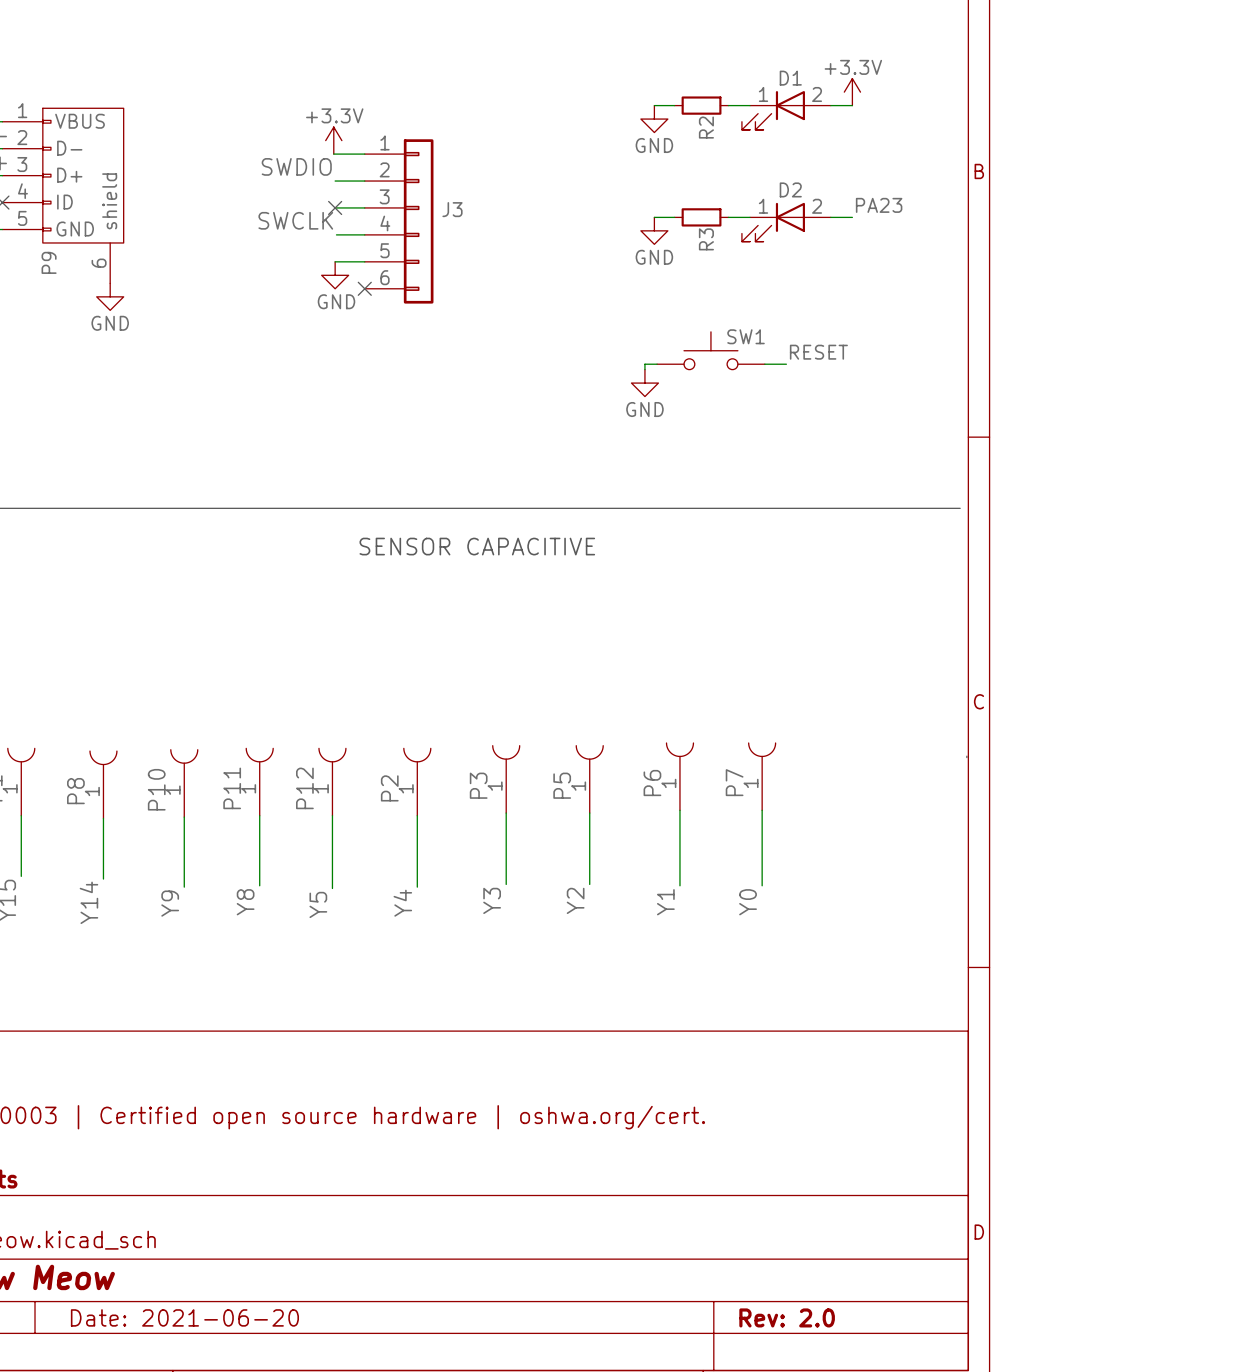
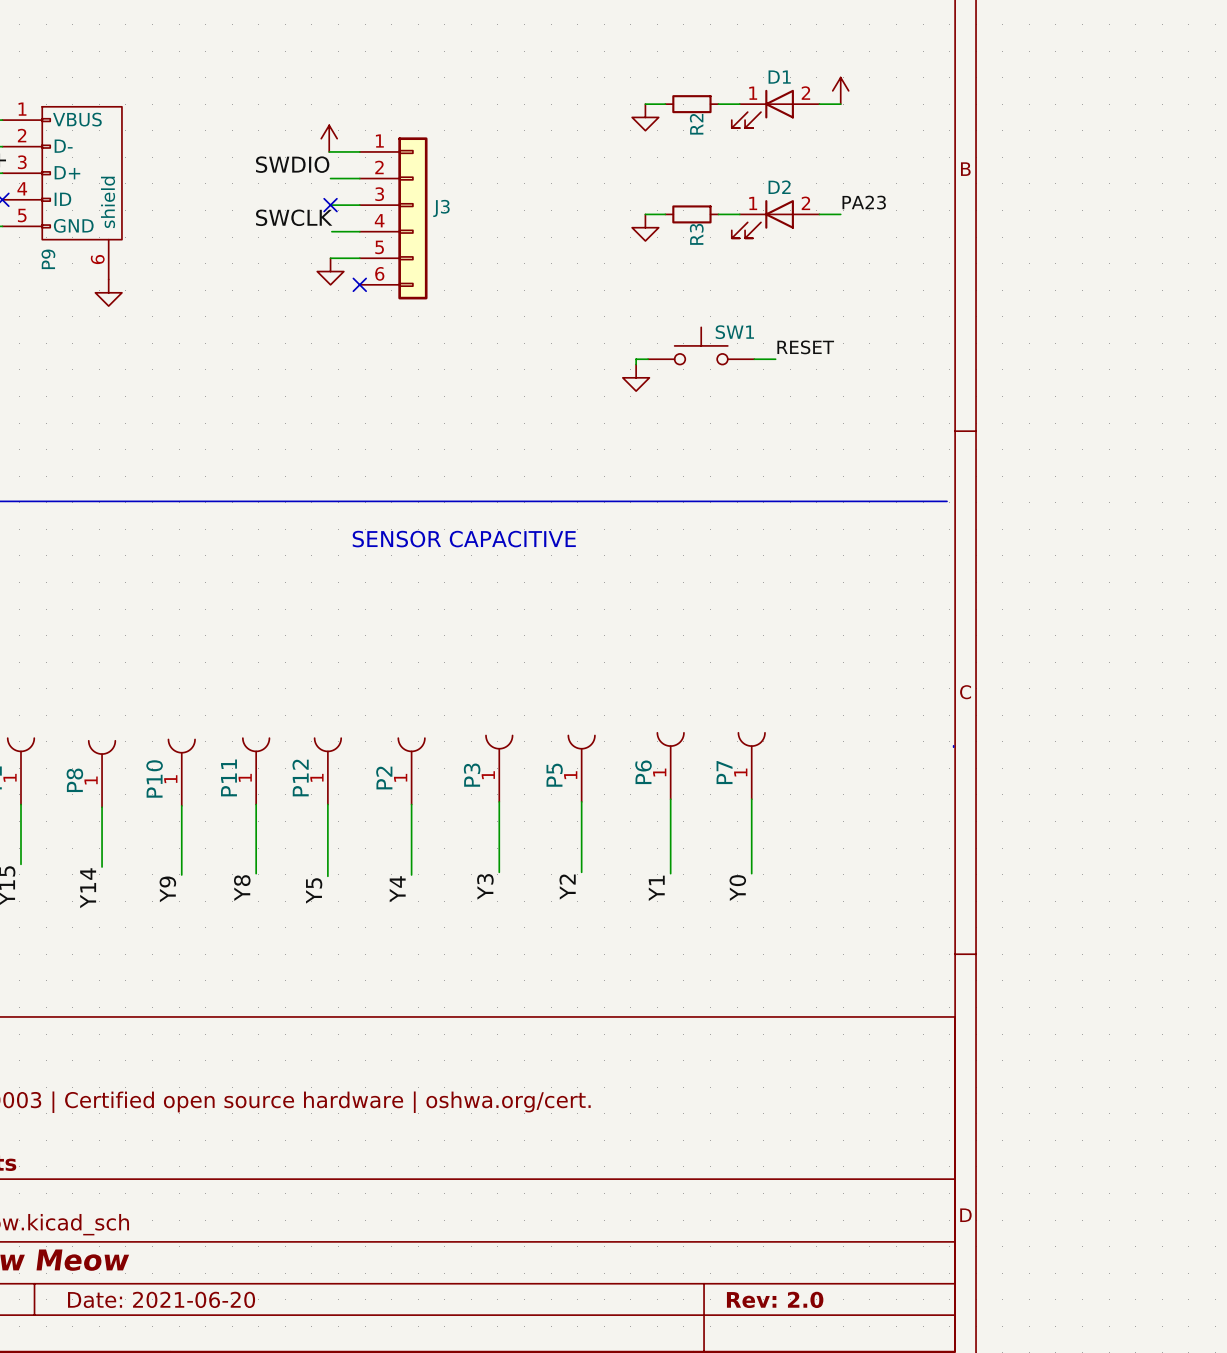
power symbol text: +3.3V (853, 67) -> none
power symbol text: +3.3V (334, 115) -> none
power symbol text: GND (654, 145) -> none
power symbol text: GND (654, 257) -> none
power symbol text: GND (336, 301) -> none
power symbol text: GND (110, 323) -> none
power symbol text: GND (644, 409) -> none

